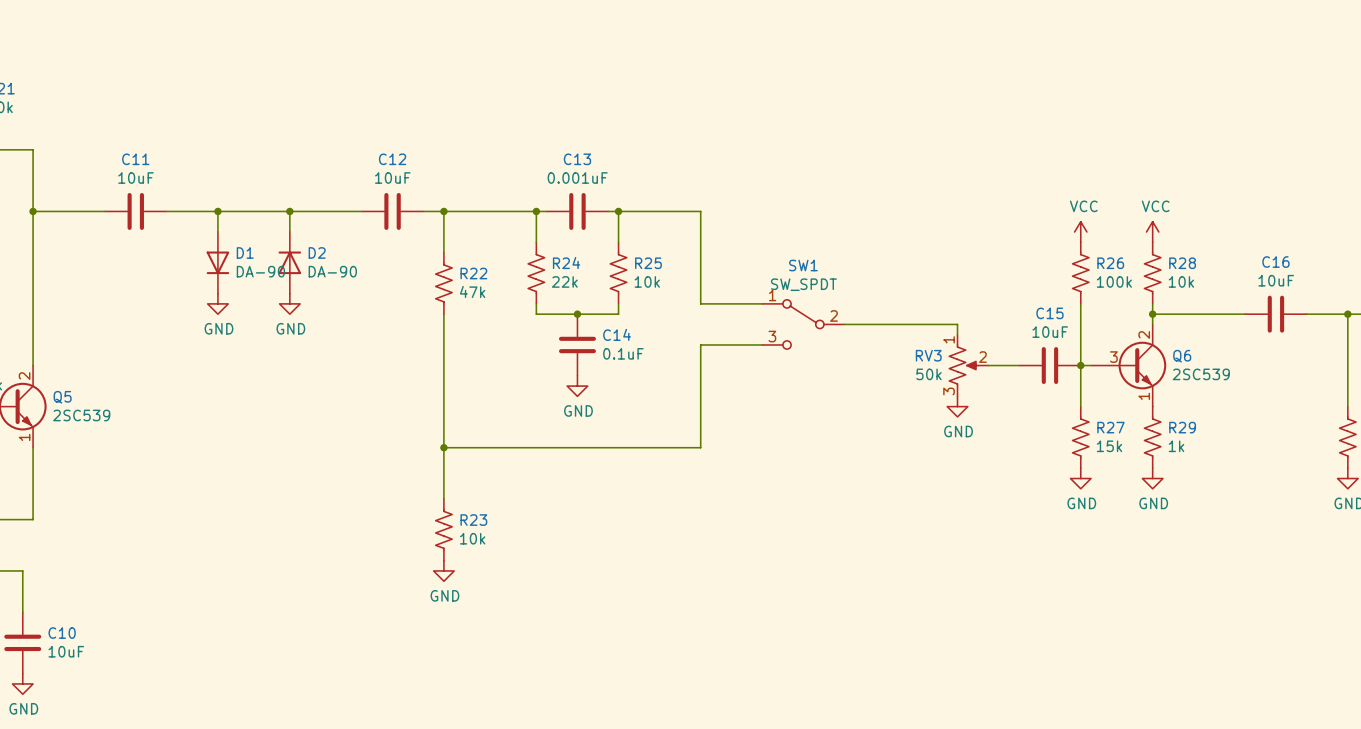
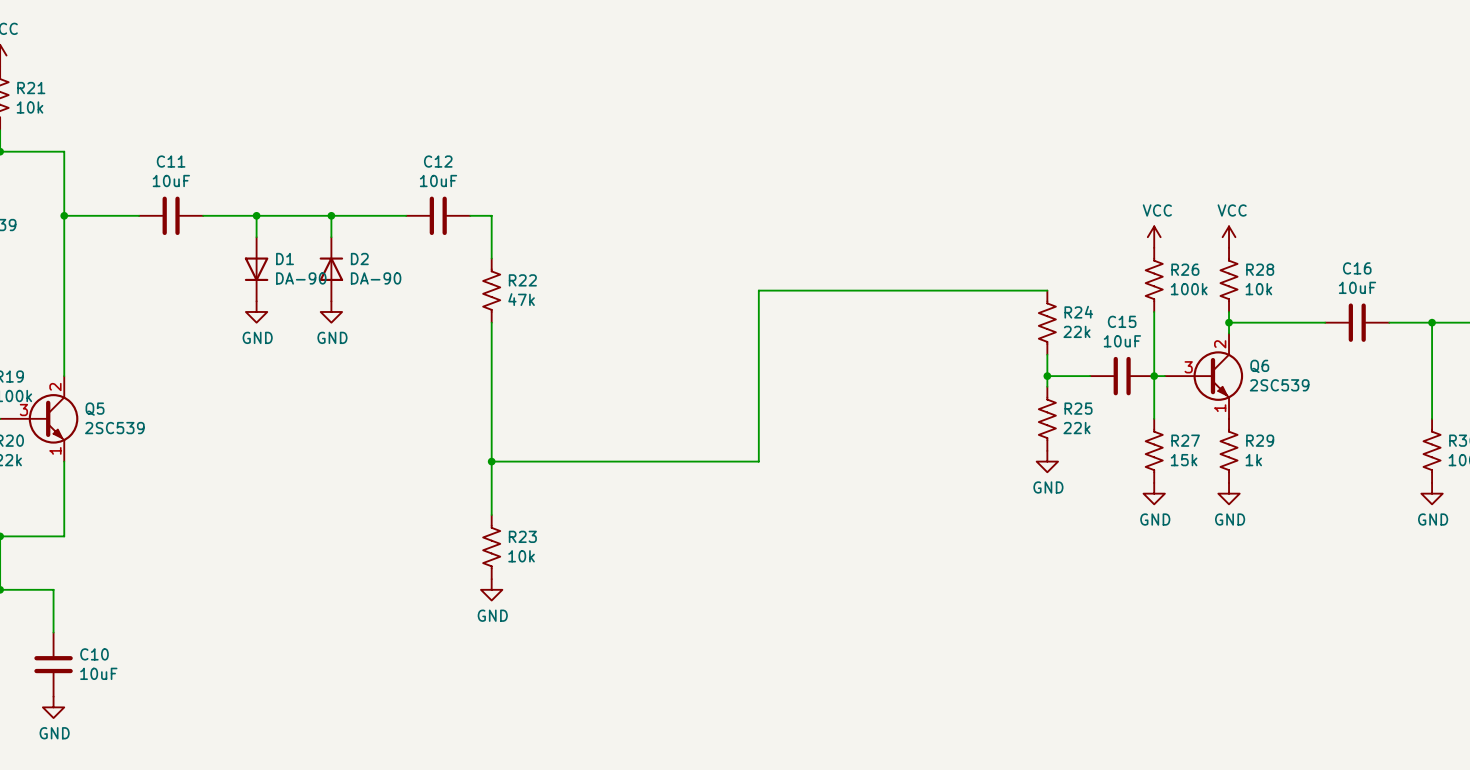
wire: (443, 211) (546, 211) -> none
junction: (443, 211) -> none
wire: (536, 211) (536, 242) -> none
junction: (536, 211) -> none
C13: 0.001uF (577, 211) -> none
wire: (608, 211) (700, 211) (700, 283) -> (1047, 290) (758, 290)
wire: (618, 211) (618, 242) -> none
junction: (618, 211) -> none
R24 position: (536, 273) -> (1047, 322)
R25 position: (618, 273) -> (1047, 418)
R25 value: 10k (647, 281) -> 22k (1076, 428)
wire: (536, 303) (536, 314) (618, 314) (618, 303) -> none
wire: (700, 303) (762, 303) -> (758, 311) (758, 354)
junction: (577, 314) -> none
SW1: SW_SPDT (803, 324) -> none
wire: (844, 324) (957, 324) (957, 334) -> none
C14: 0.1uF (577, 344) -> none
wire: (700, 344) (762, 344) -> none
wire: none -> (1047, 354) (1047, 386)
RV3: 50k (968, 365) -> none
junction: none -> (1047, 376)
power symbol: GND (577, 386) -> none
power symbol position: GND (957, 406) -> GND (1047, 461)

